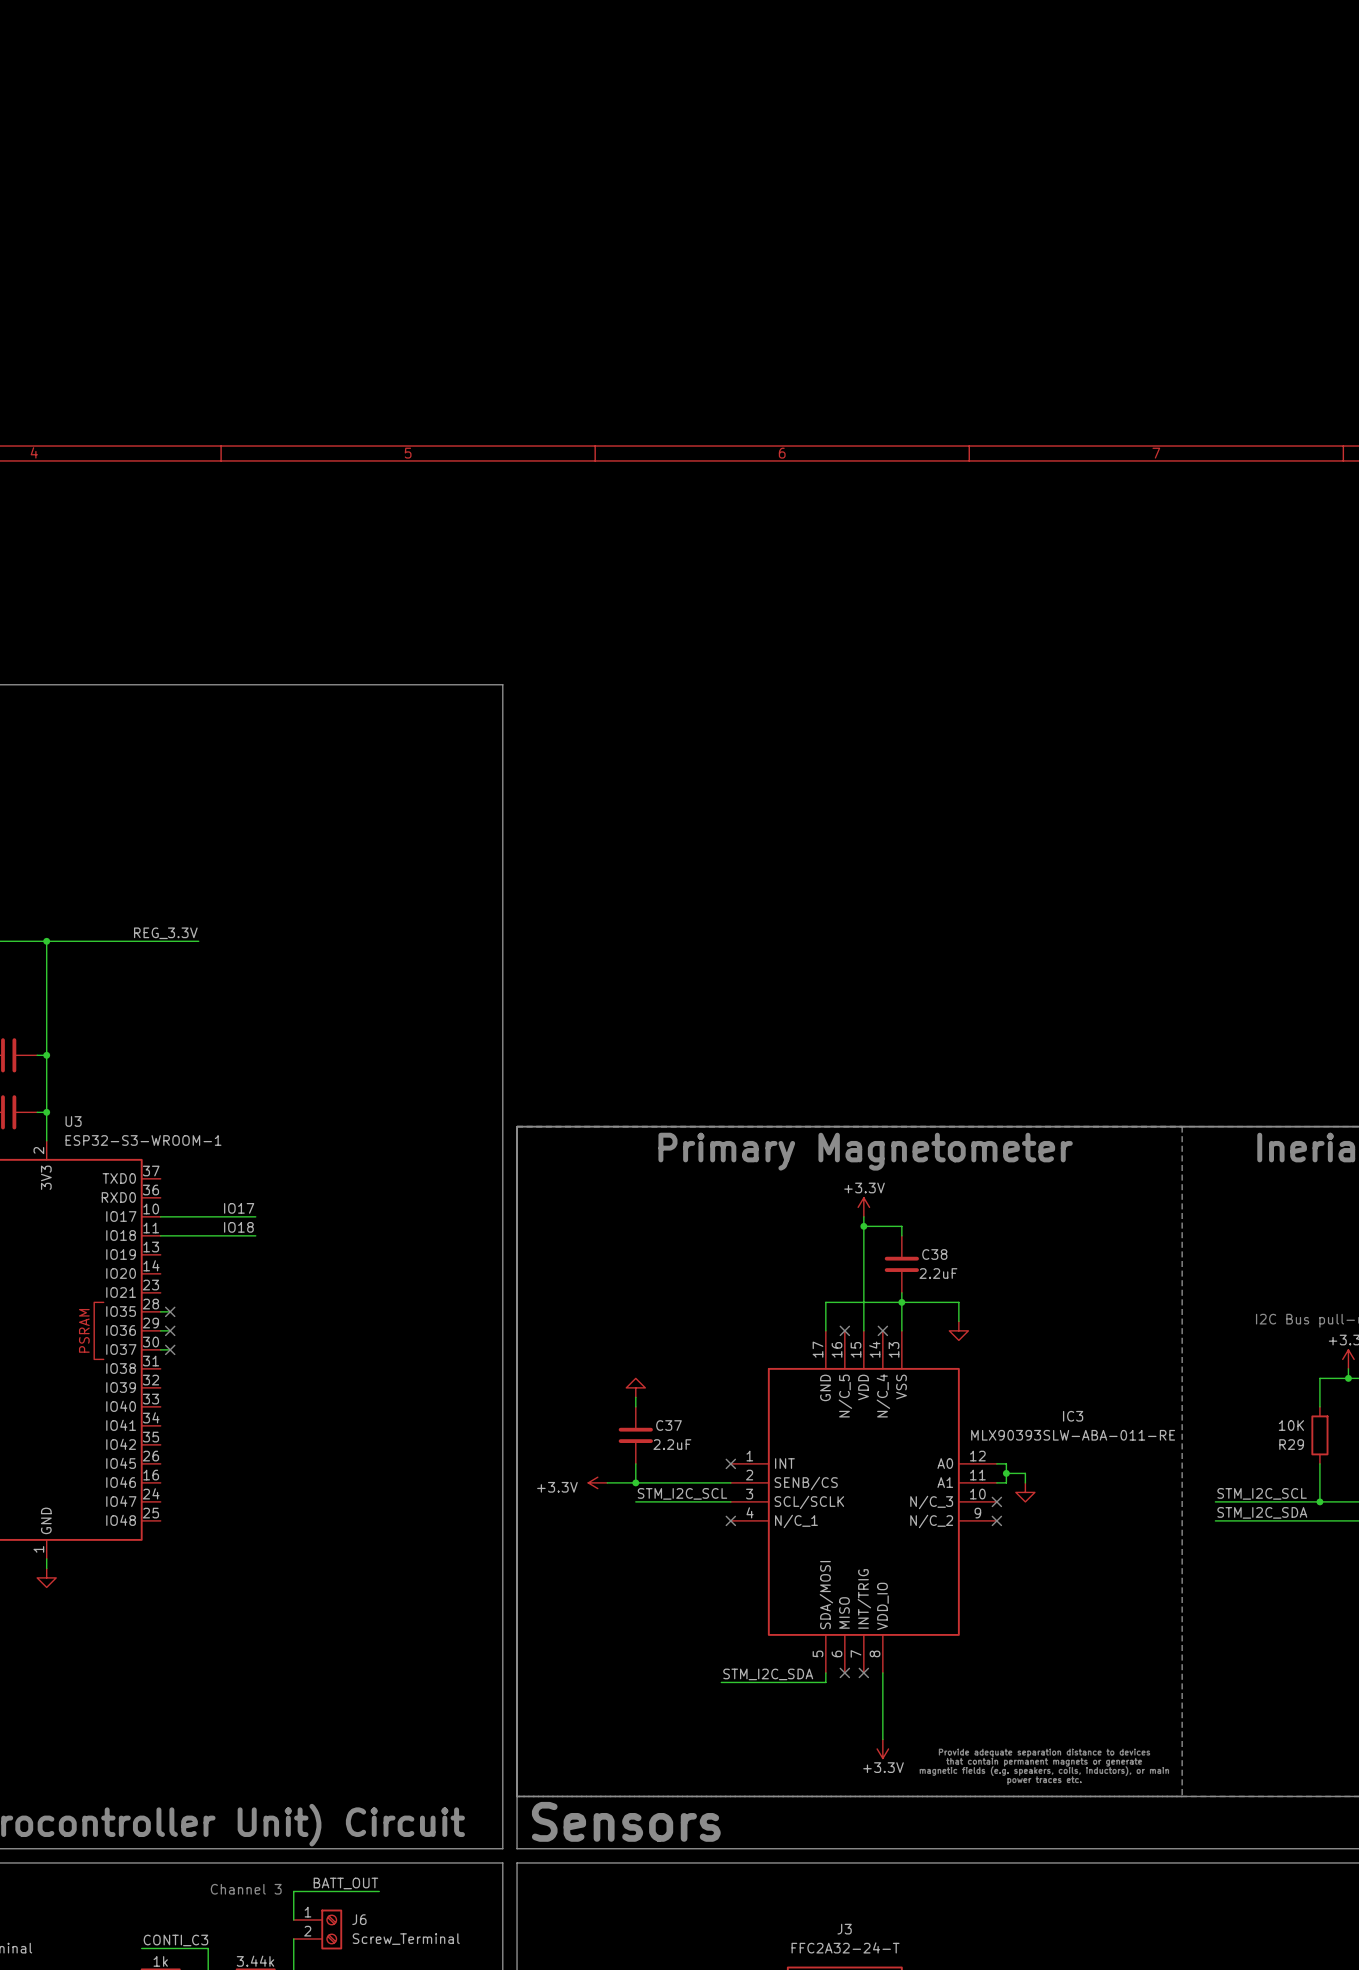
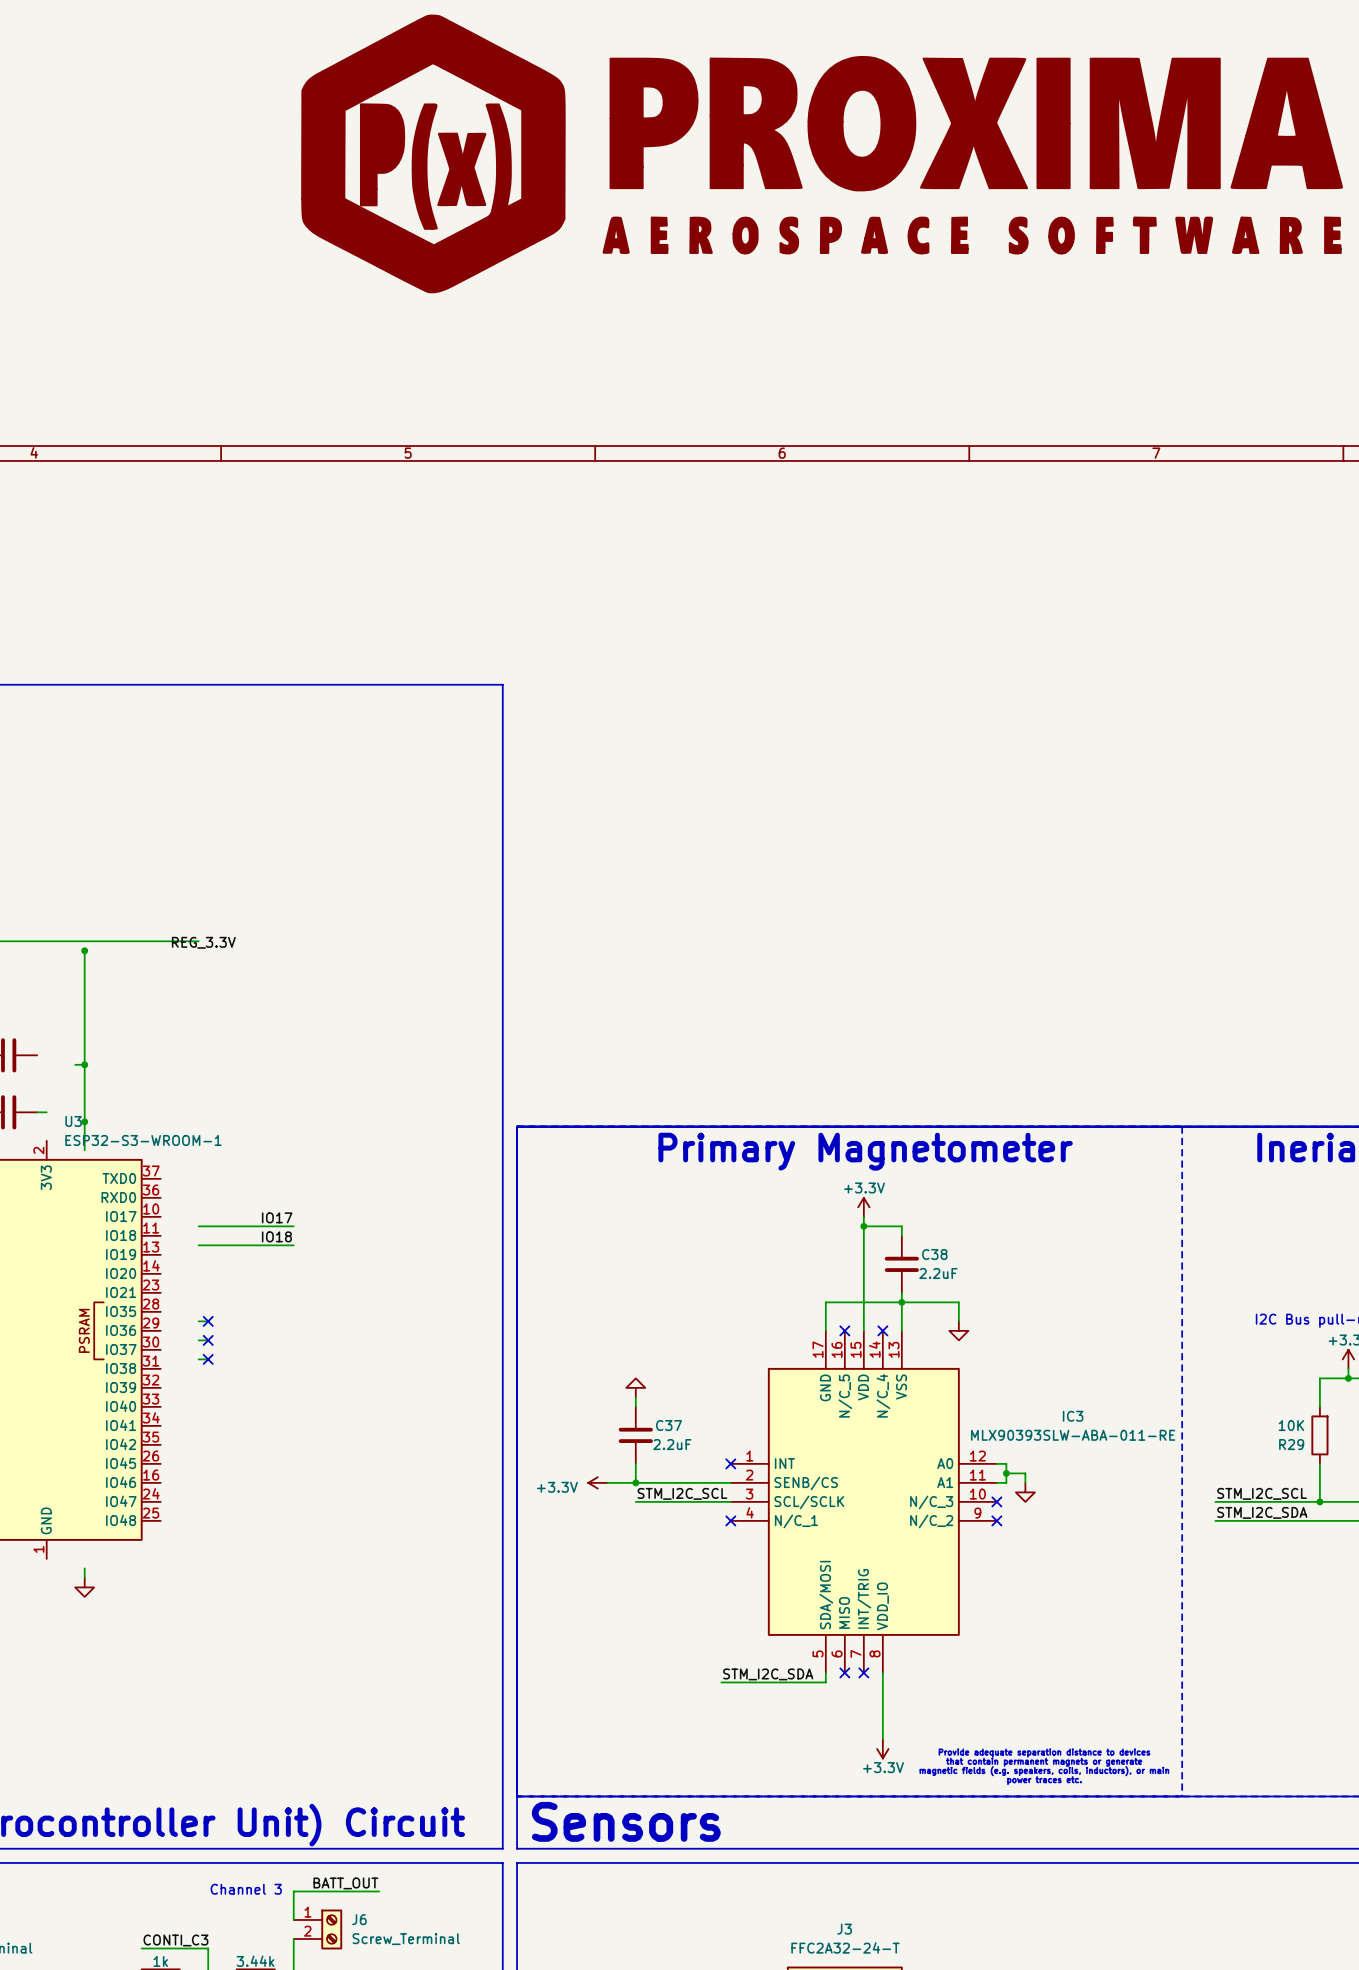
drawing: none -> [302, 15, 1343, 293]
label position: REG_3.3V (165, 933) -> REG_3.3V (203, 942)
wire: (46, 941) (46, 1140) -> (84, 950) (84, 1150)
junction position: (46, 941) -> (84, 950)
wire: (37, 1055) (46, 1055) -> (75, 1064) (84, 1064)
junction: (46, 1055) -> none
junction: none -> (84, 1064)
junction: (46, 1112) -> none
junction: none -> (84, 1121)
label position: IO17 (239, 1208) -> IO17 (277, 1217)
wire: (160, 1216) (255, 1216) -> (198, 1226) (293, 1226)
label position: IO18 (238, 1227) -> IO18 (276, 1236)
wire: (160, 1235) (255, 1235) -> (198, 1245) (293, 1245)
wire: (160, 1311) (170, 1311) -> (198, 1321) (208, 1321)
no-connect mark: (170, 1311) -> none
no-connect mark: none -> (208, 1321)
wire: (160, 1330) (170, 1330) -> (198, 1340) (208, 1340)
no-connect mark: (170, 1330) -> none
no-connect mark: none -> (208, 1340)
wire: (160, 1349) (170, 1349) -> (198, 1359) (208, 1359)
no-connect mark: (170, 1349) -> none
no-connect mark: none -> (208, 1359)
wire: (46, 1558) (46, 1568) -> (84, 1568) (84, 1577)
power symbol position: (46, 1577) -> (84, 1587)

